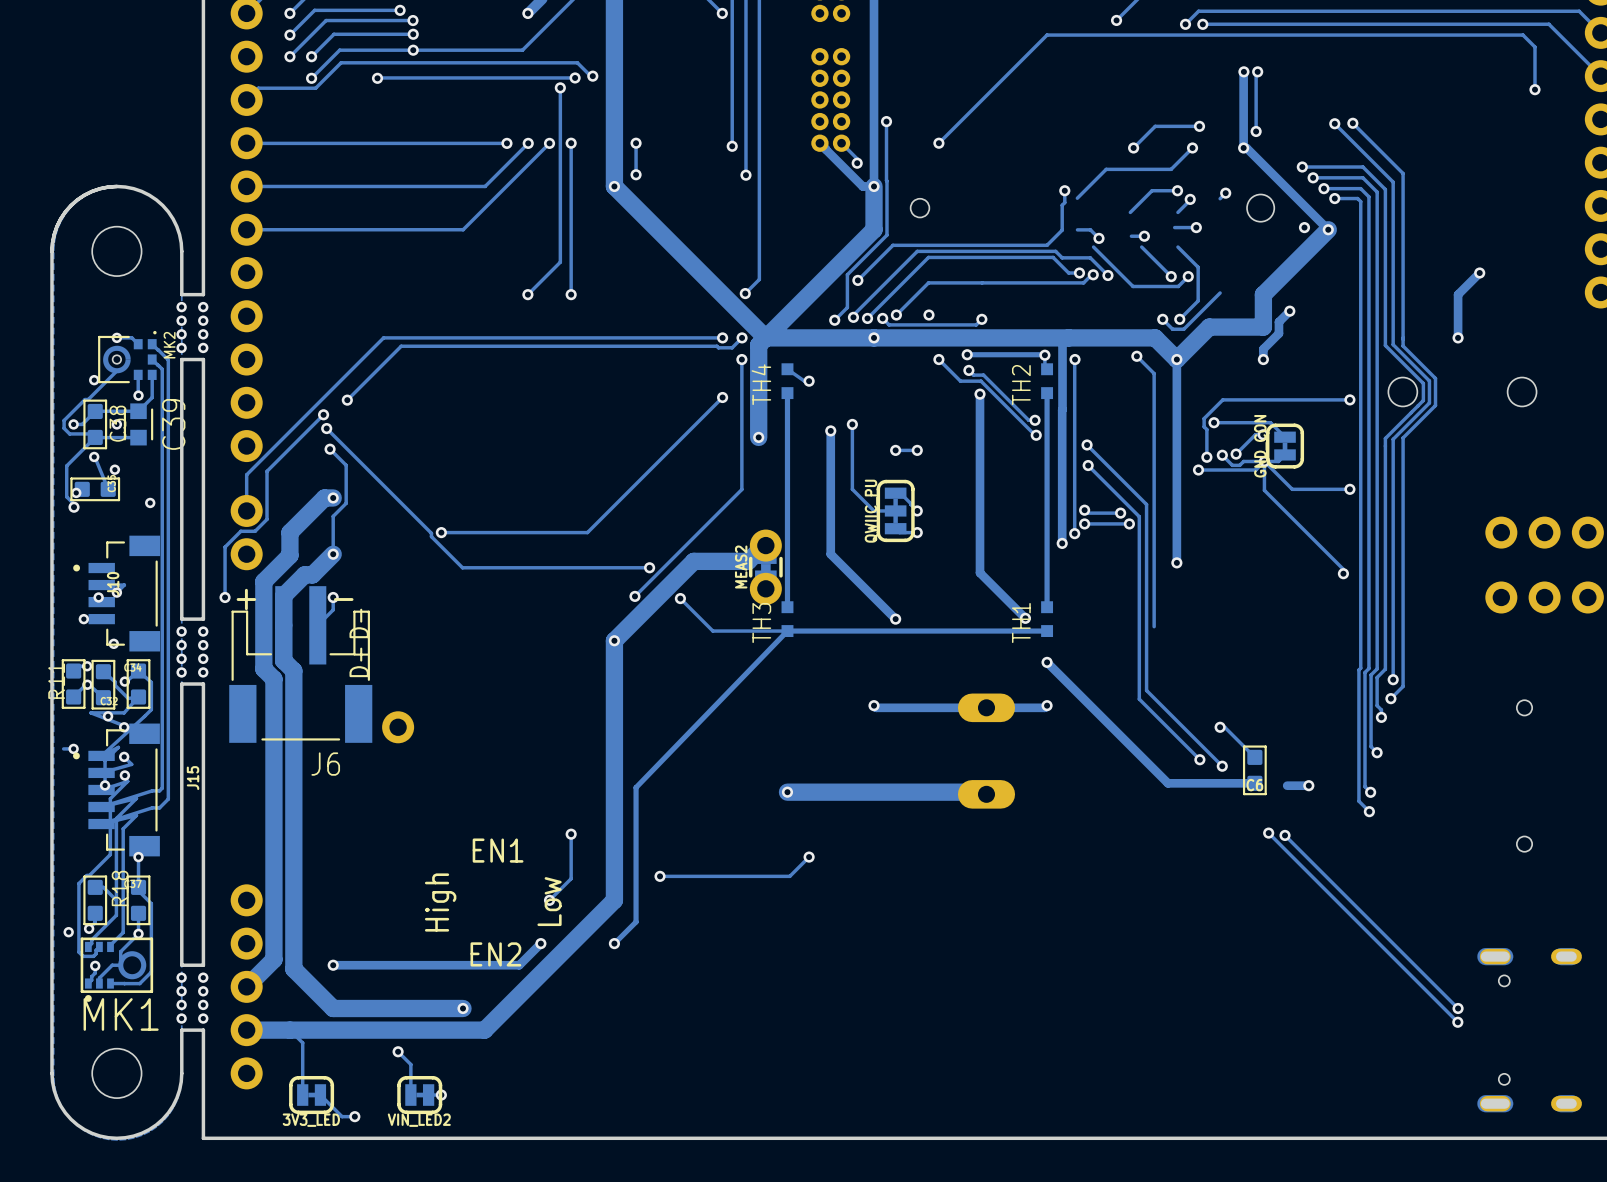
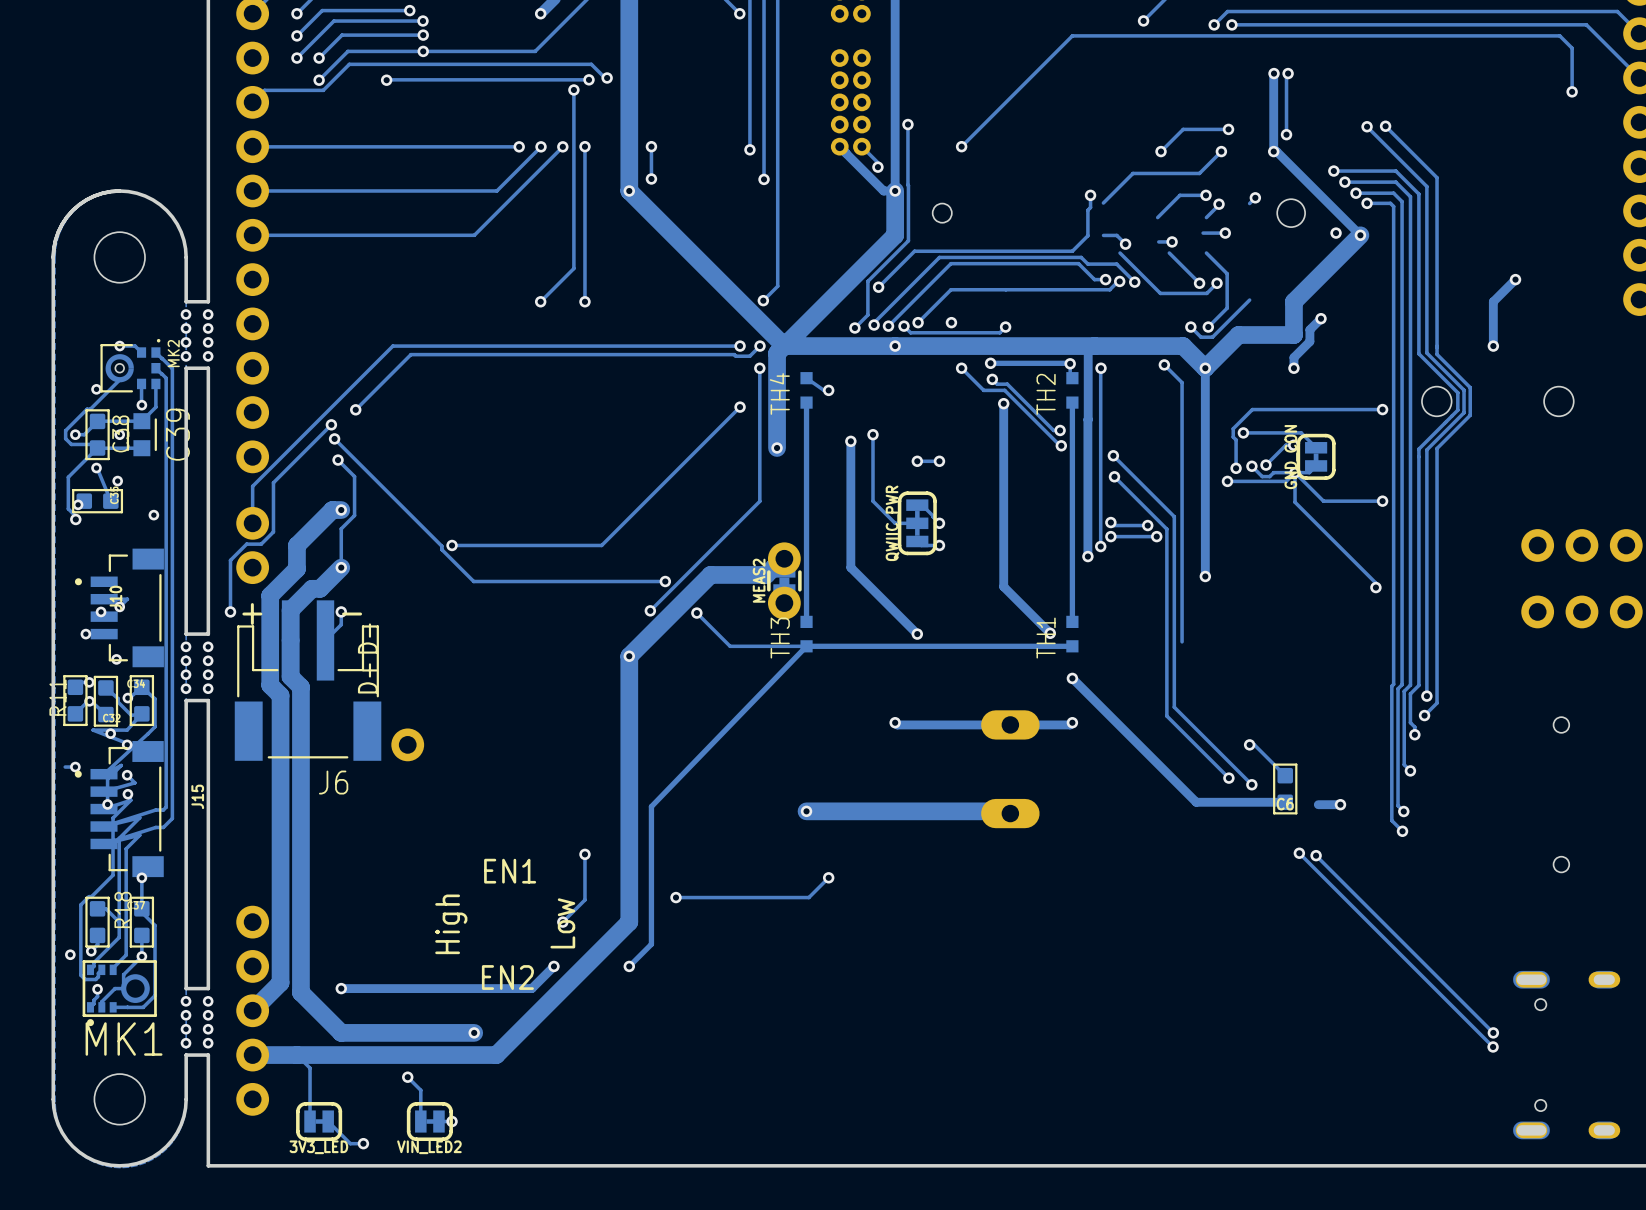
QWIIC_PU name: QWIIC_PU (871, 511) -> QWIIC_PWR (892, 523)

